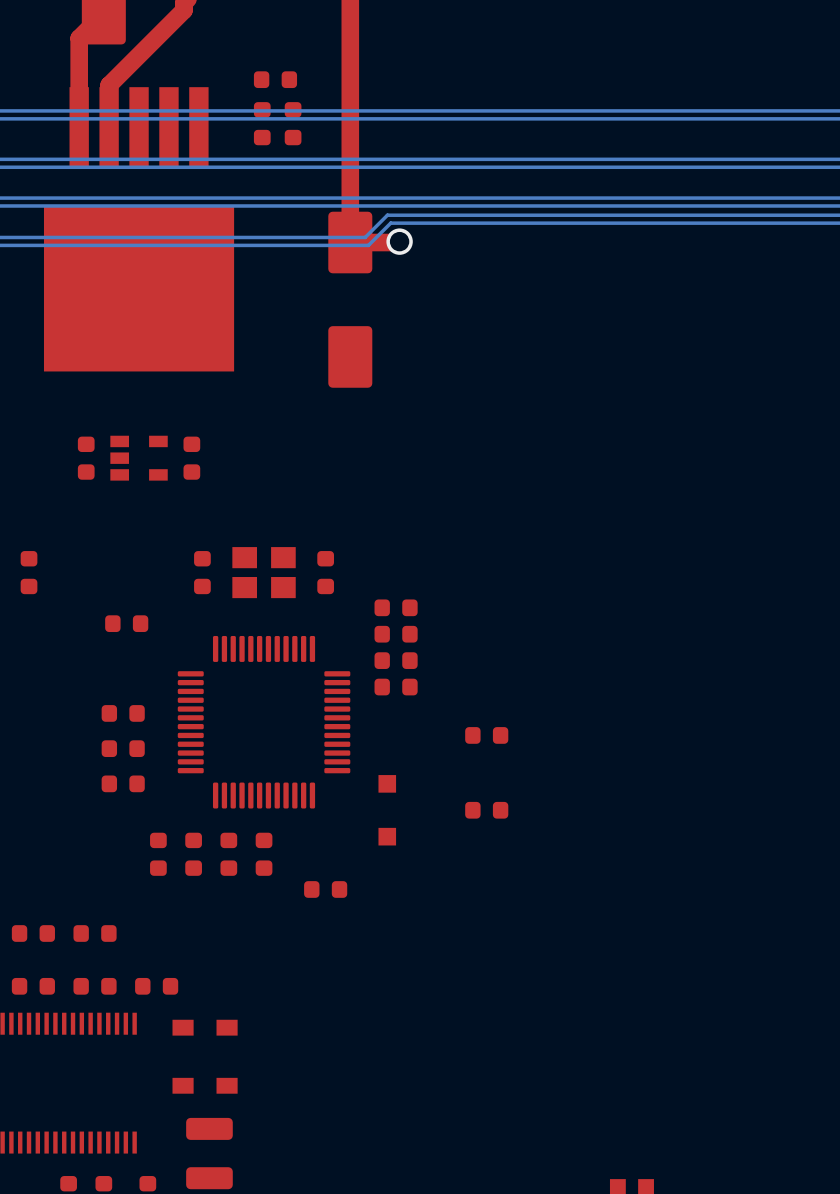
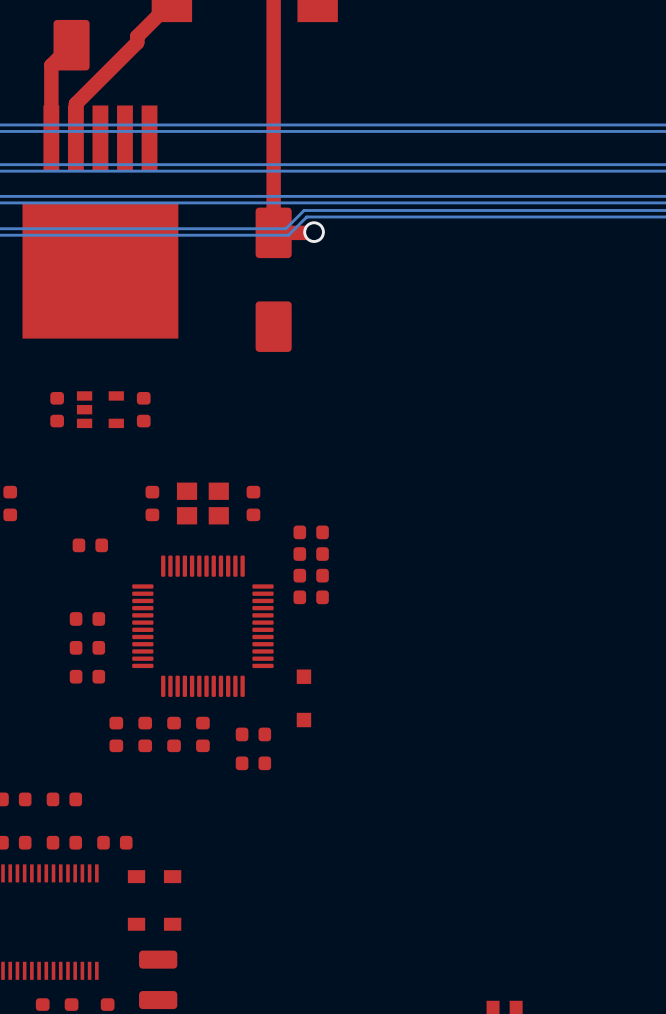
part: (275, 79) -> none
part: (262, 123) -> none
part: (293, 123) -> none
part: (486, 735) -> none
part: (486, 810) -> none
part: none -> (253, 734)

